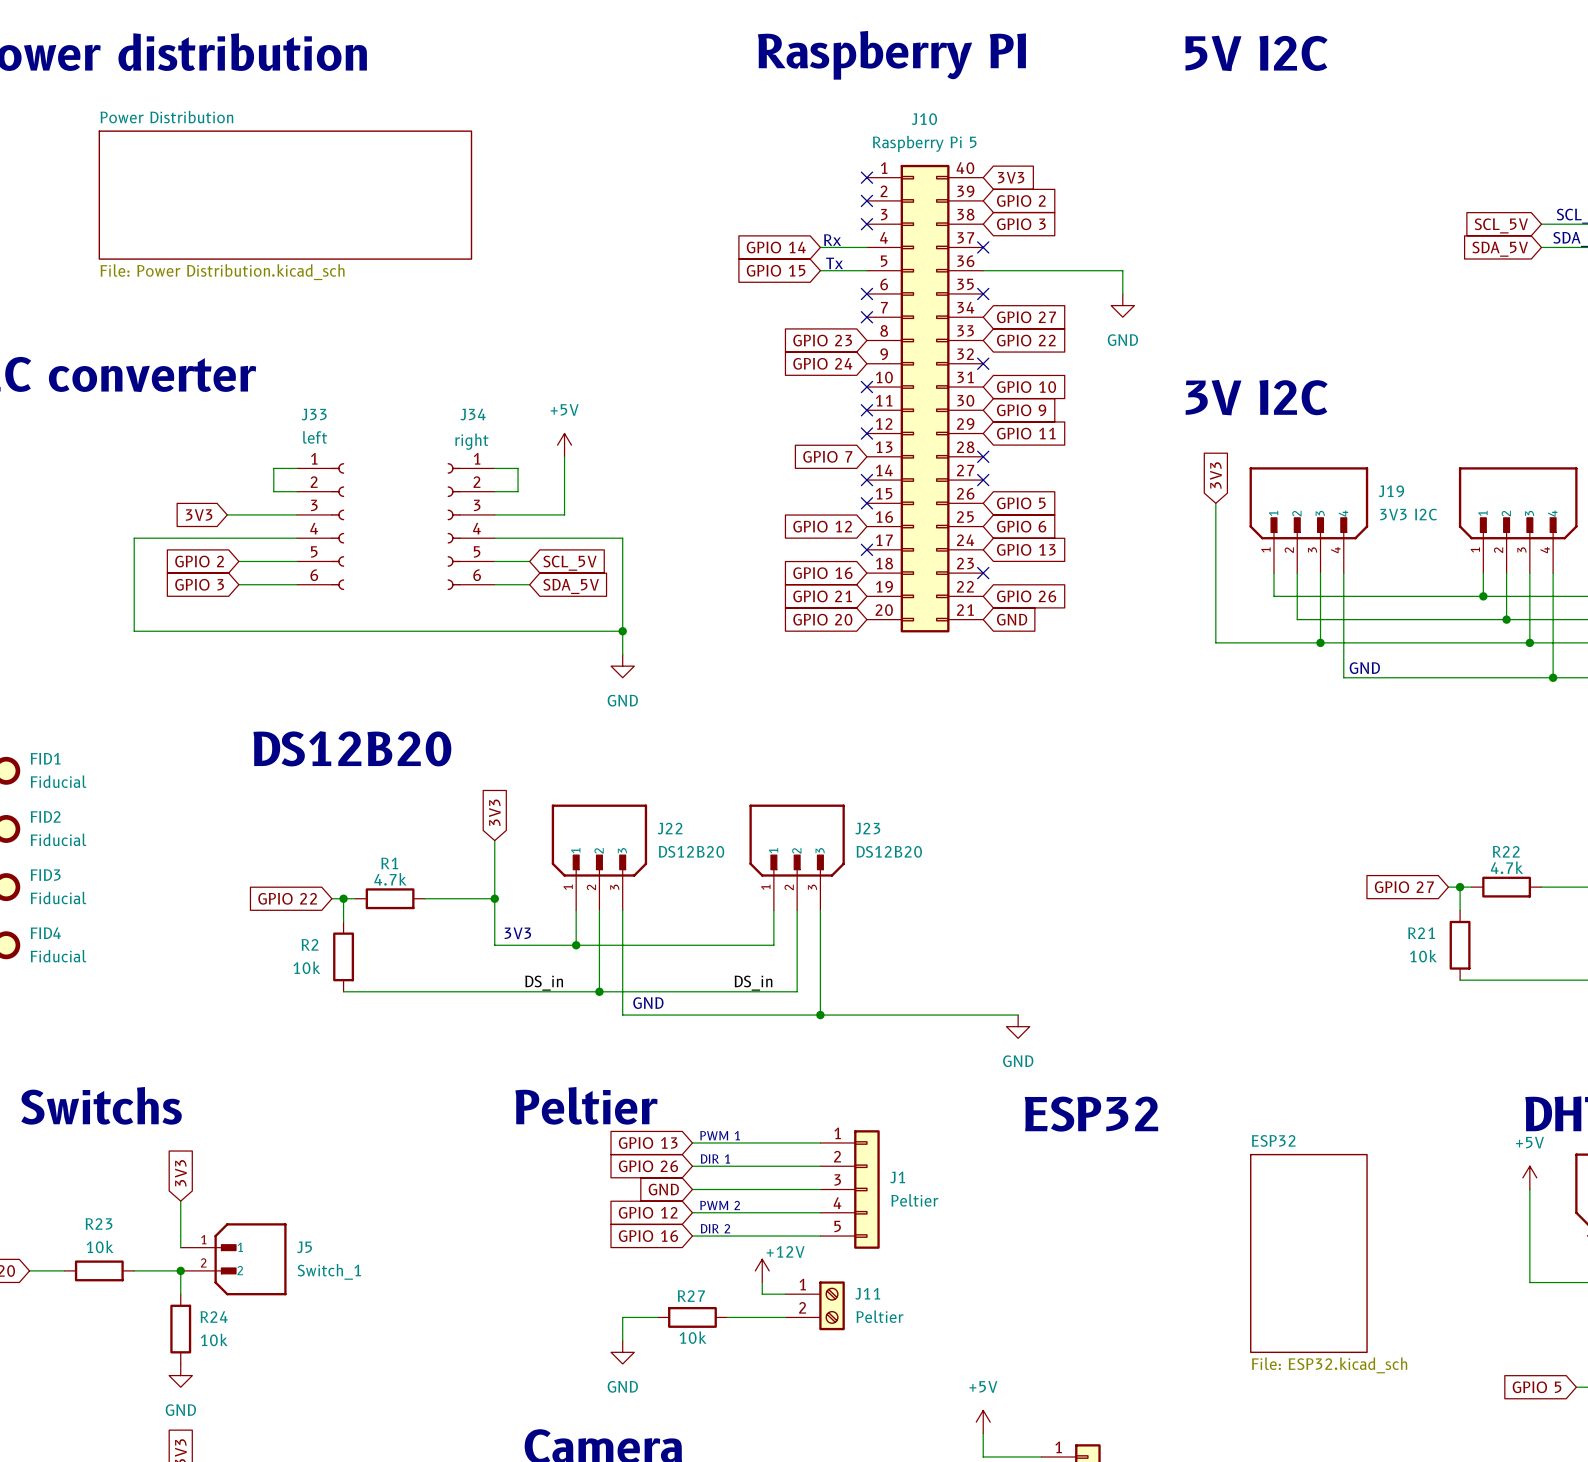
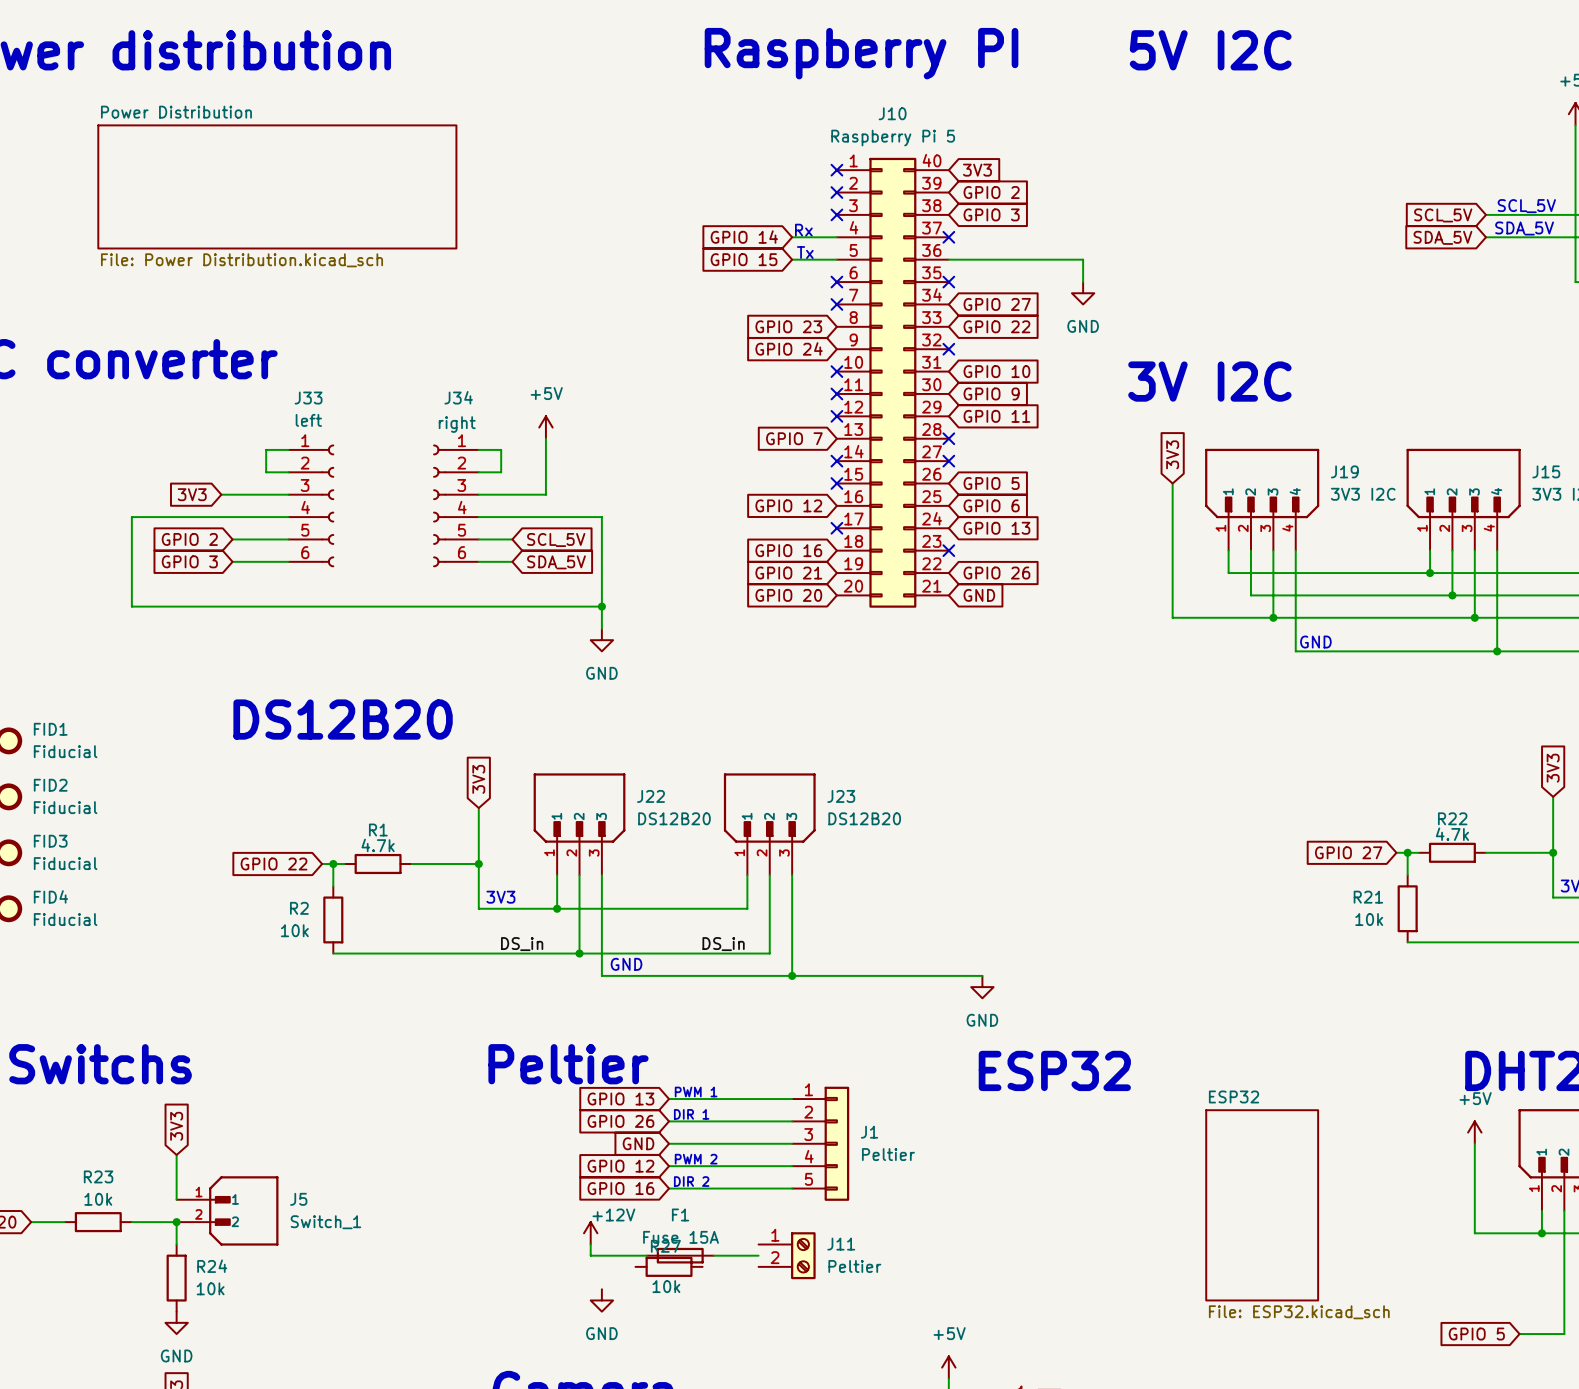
power symbol position: +12V (762, 1270) -> +12V (590, 1233)
wire: (762, 1282) (762, 1294) (785, 1294) -> none
wire: none -> (590, 1244) (590, 1255) (646, 1255)
F1: none -> Fuse 15A (680, 1255)
wire: none -> (713, 1255) (758, 1255)
wire: (657, 1317) (622, 1317) (622, 1340) -> none
wire: (727, 1317) (785, 1317) -> none

